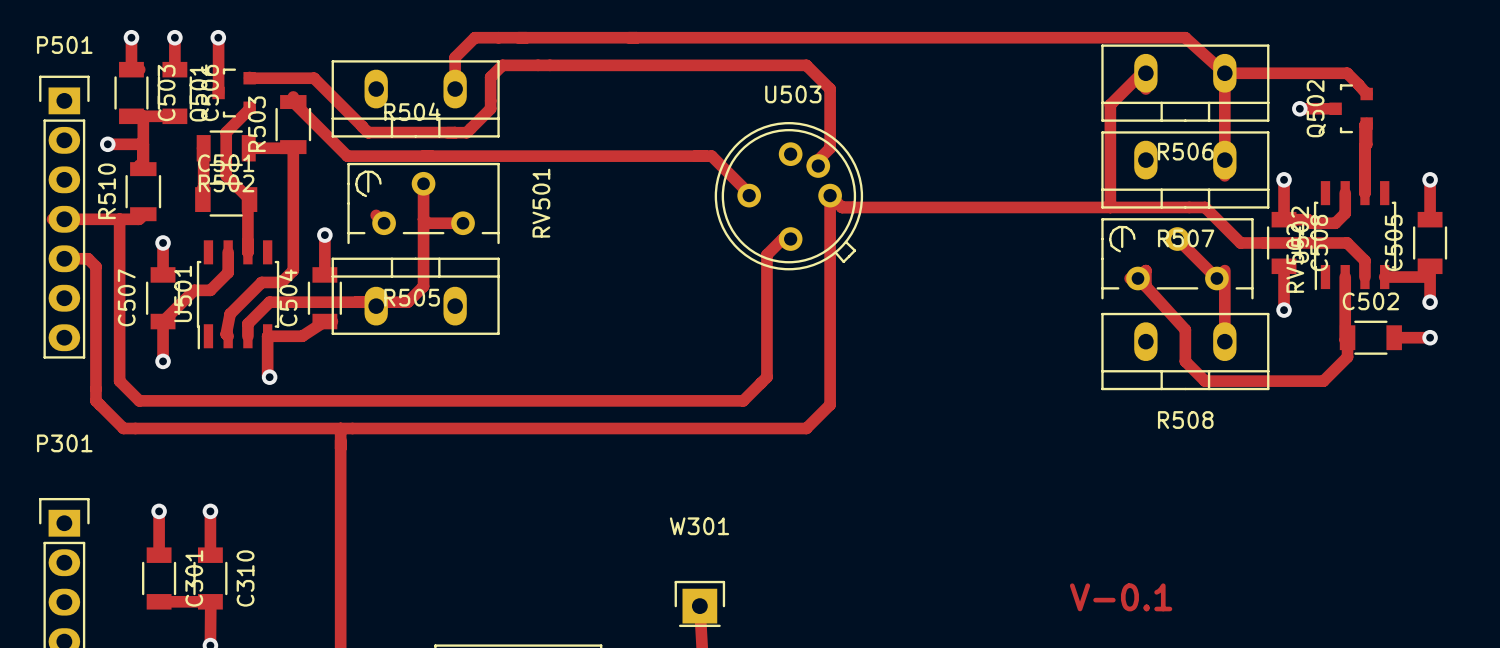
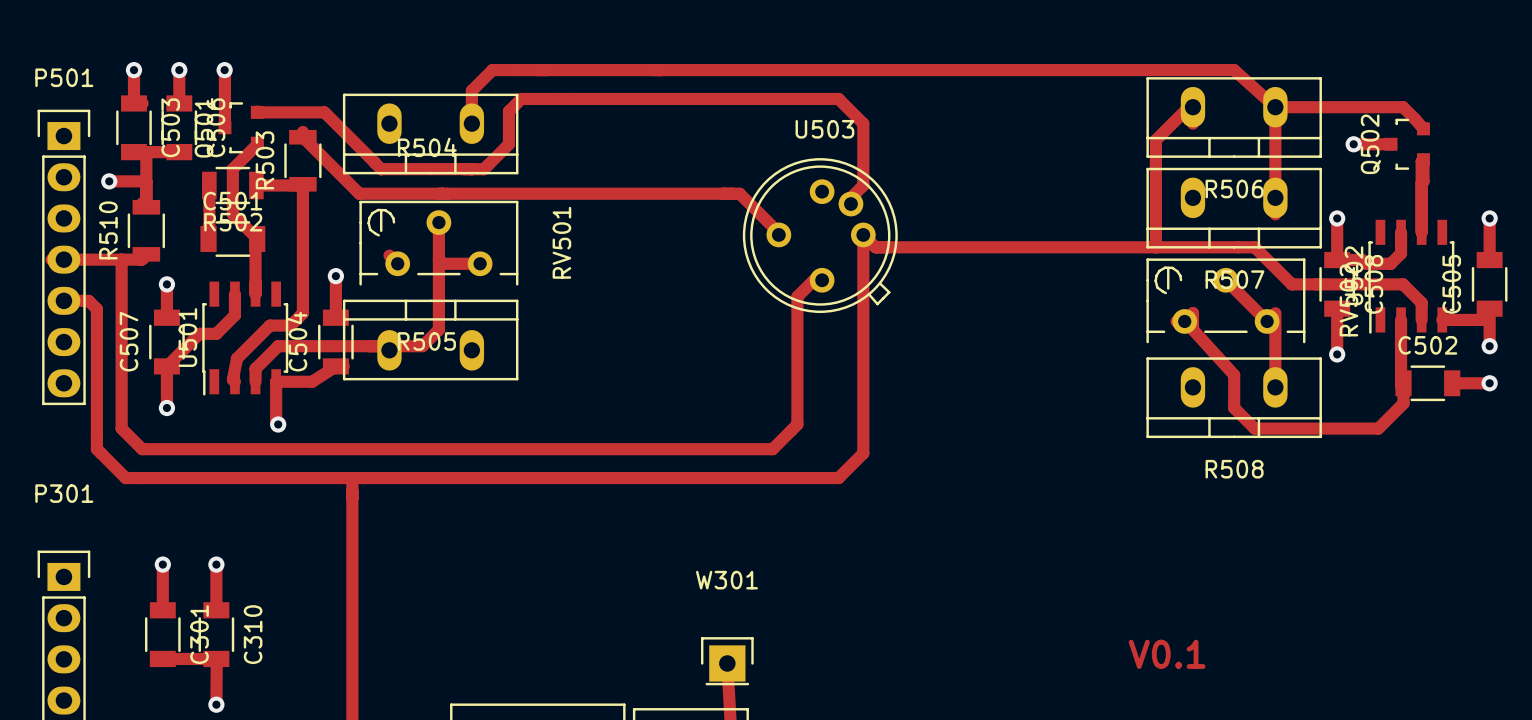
text: V-0.1 (1121, 597) -> V0.1 (1167, 654)

